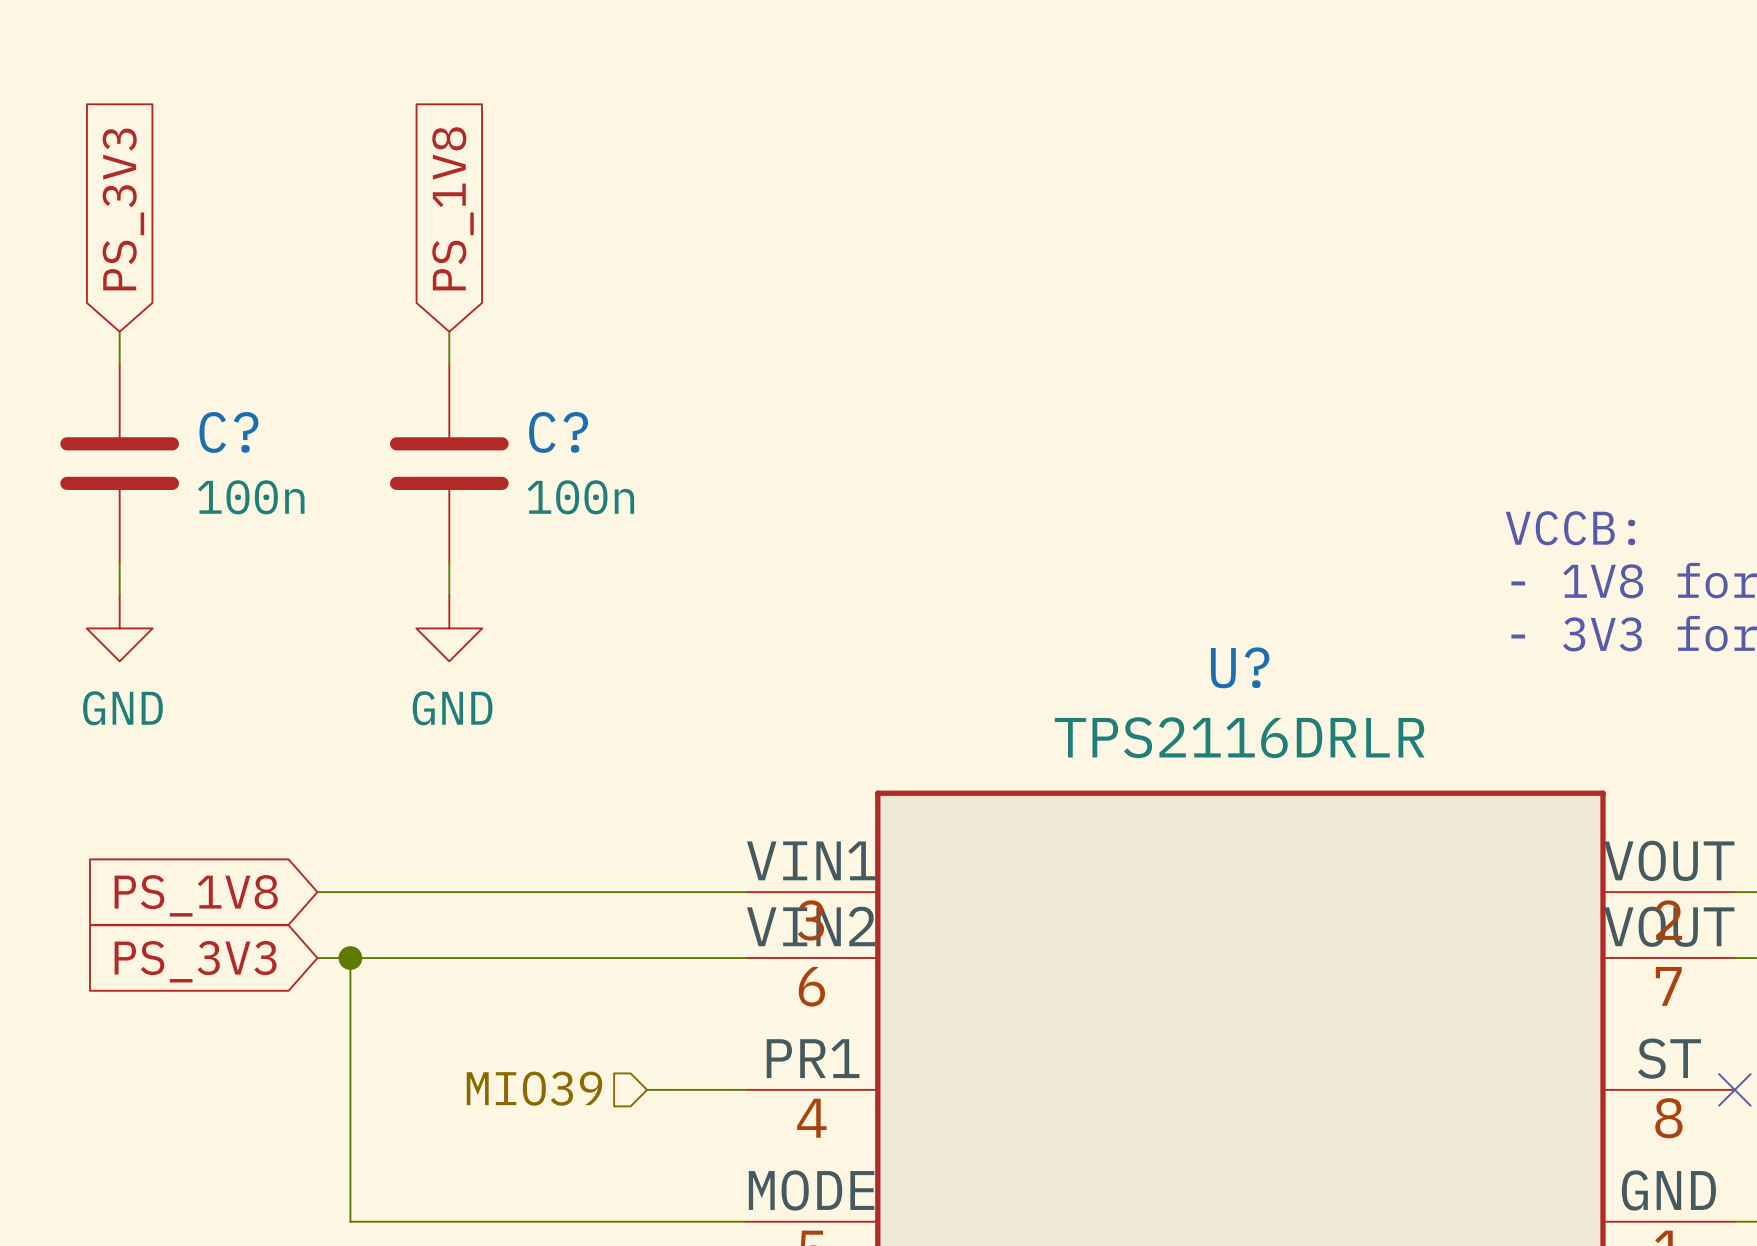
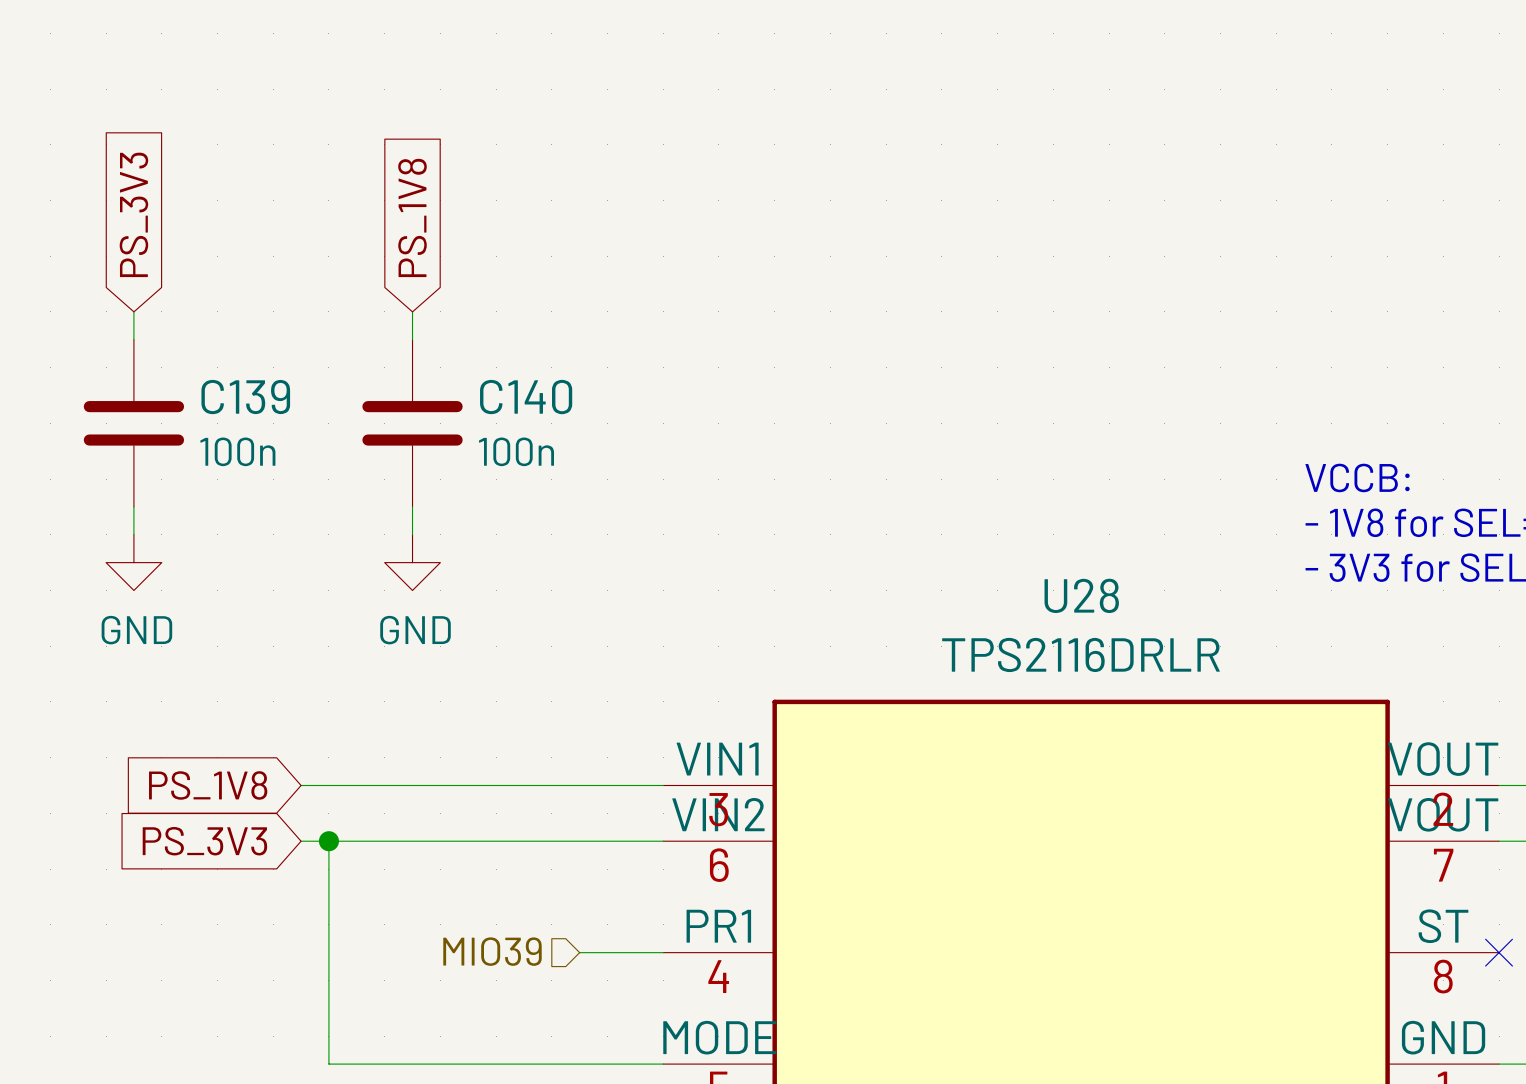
C? name: C? (228, 432) -> C139 (245, 397)
C? name: C? (558, 432) -> C140 (526, 397)
U? name: U? (1240, 667) -> U28 (1081, 595)

